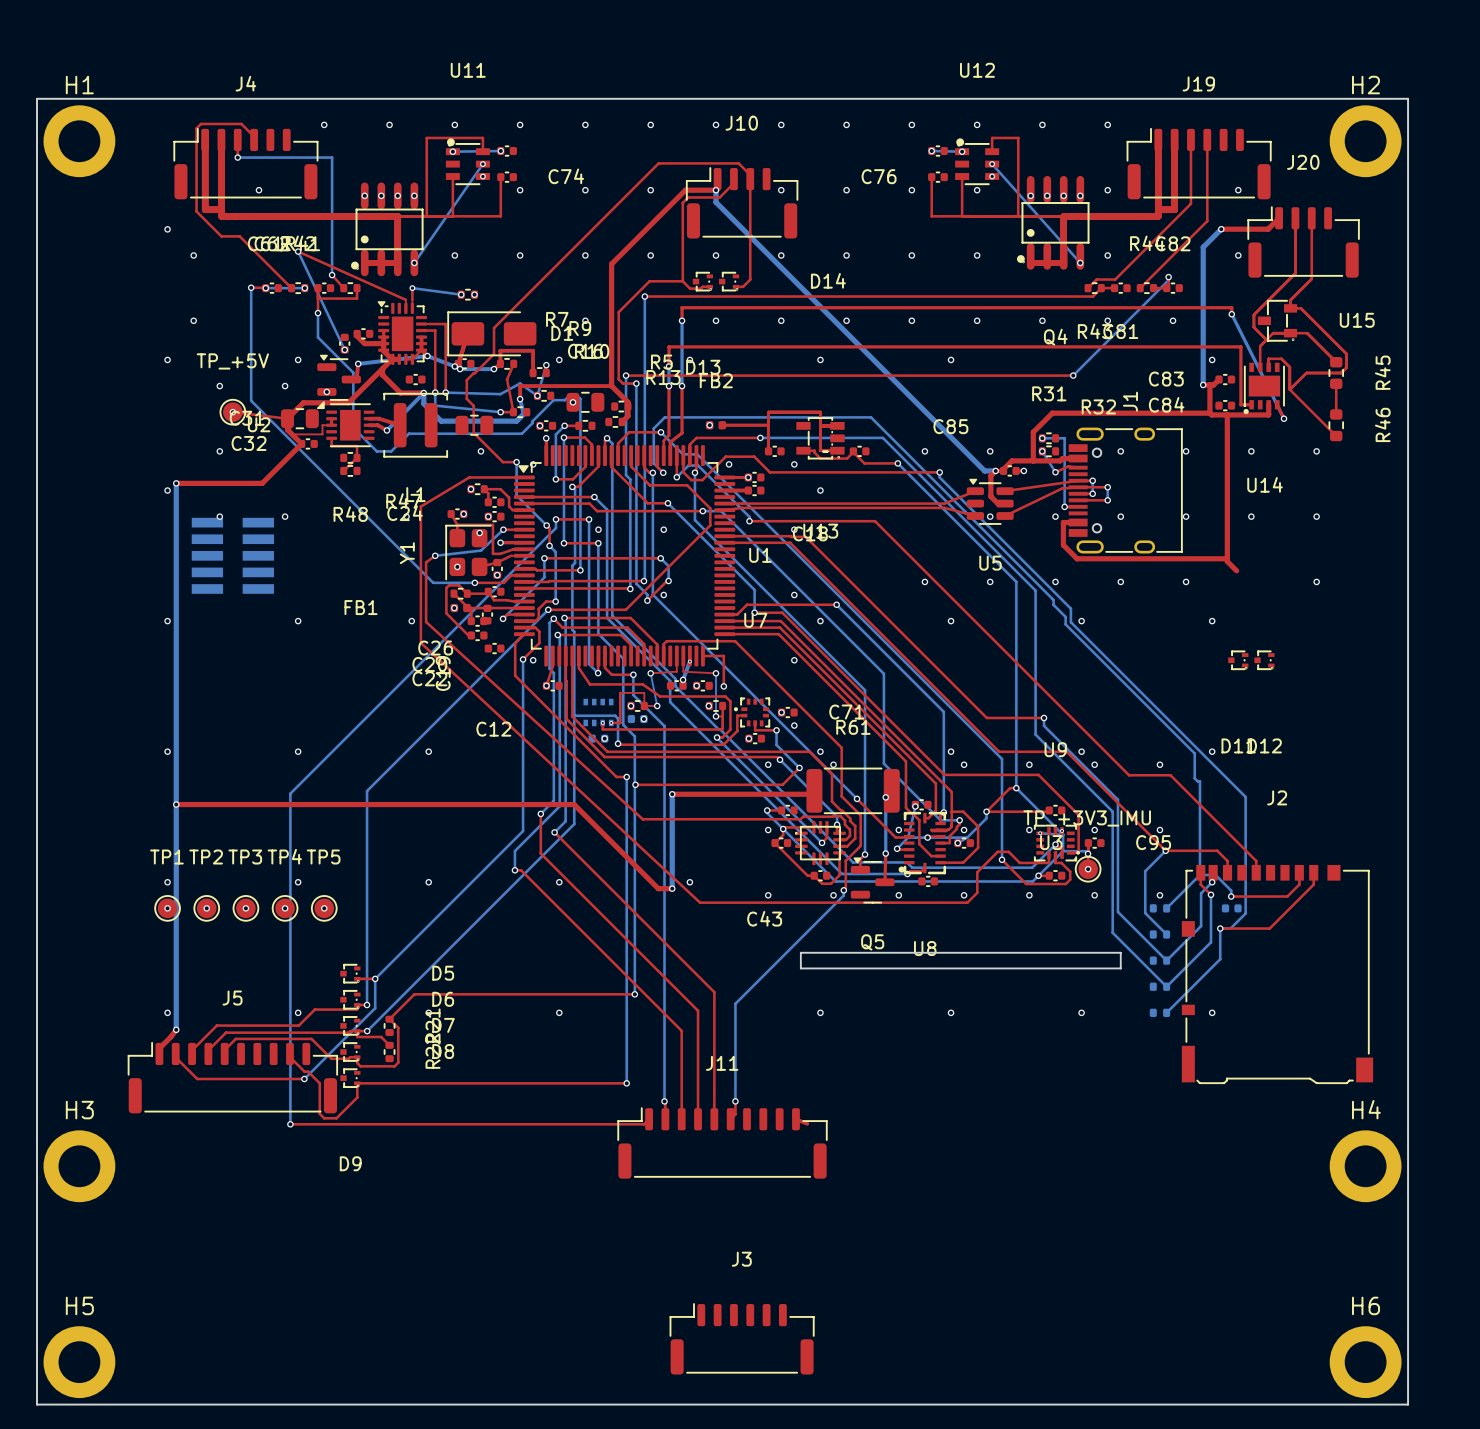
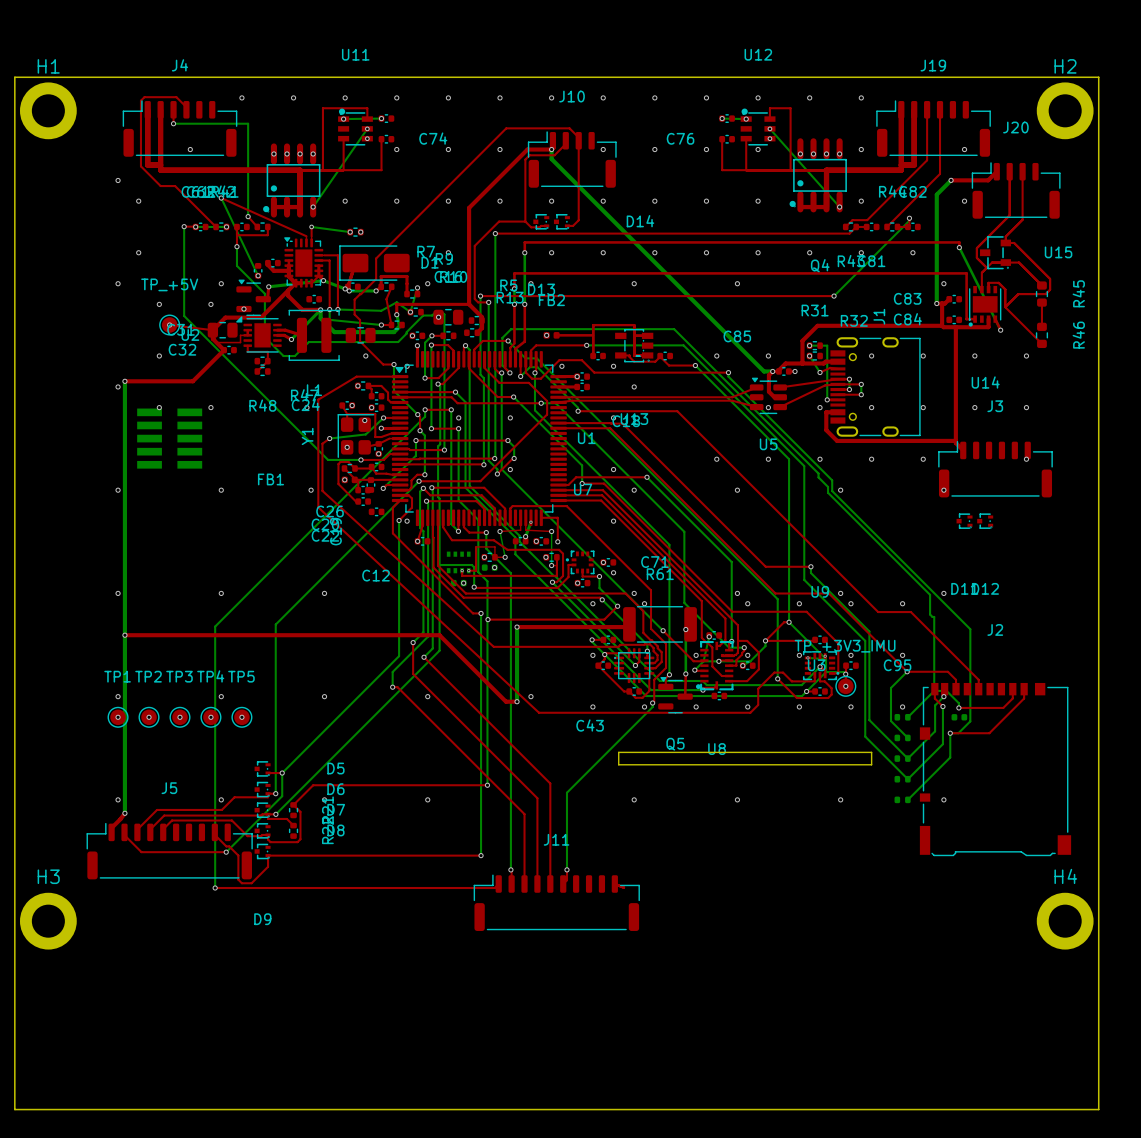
J3 position: (742, 1338) -> (995, 469)
H5: (79, 1362) -> none
H6: (1365, 1362) -> none

